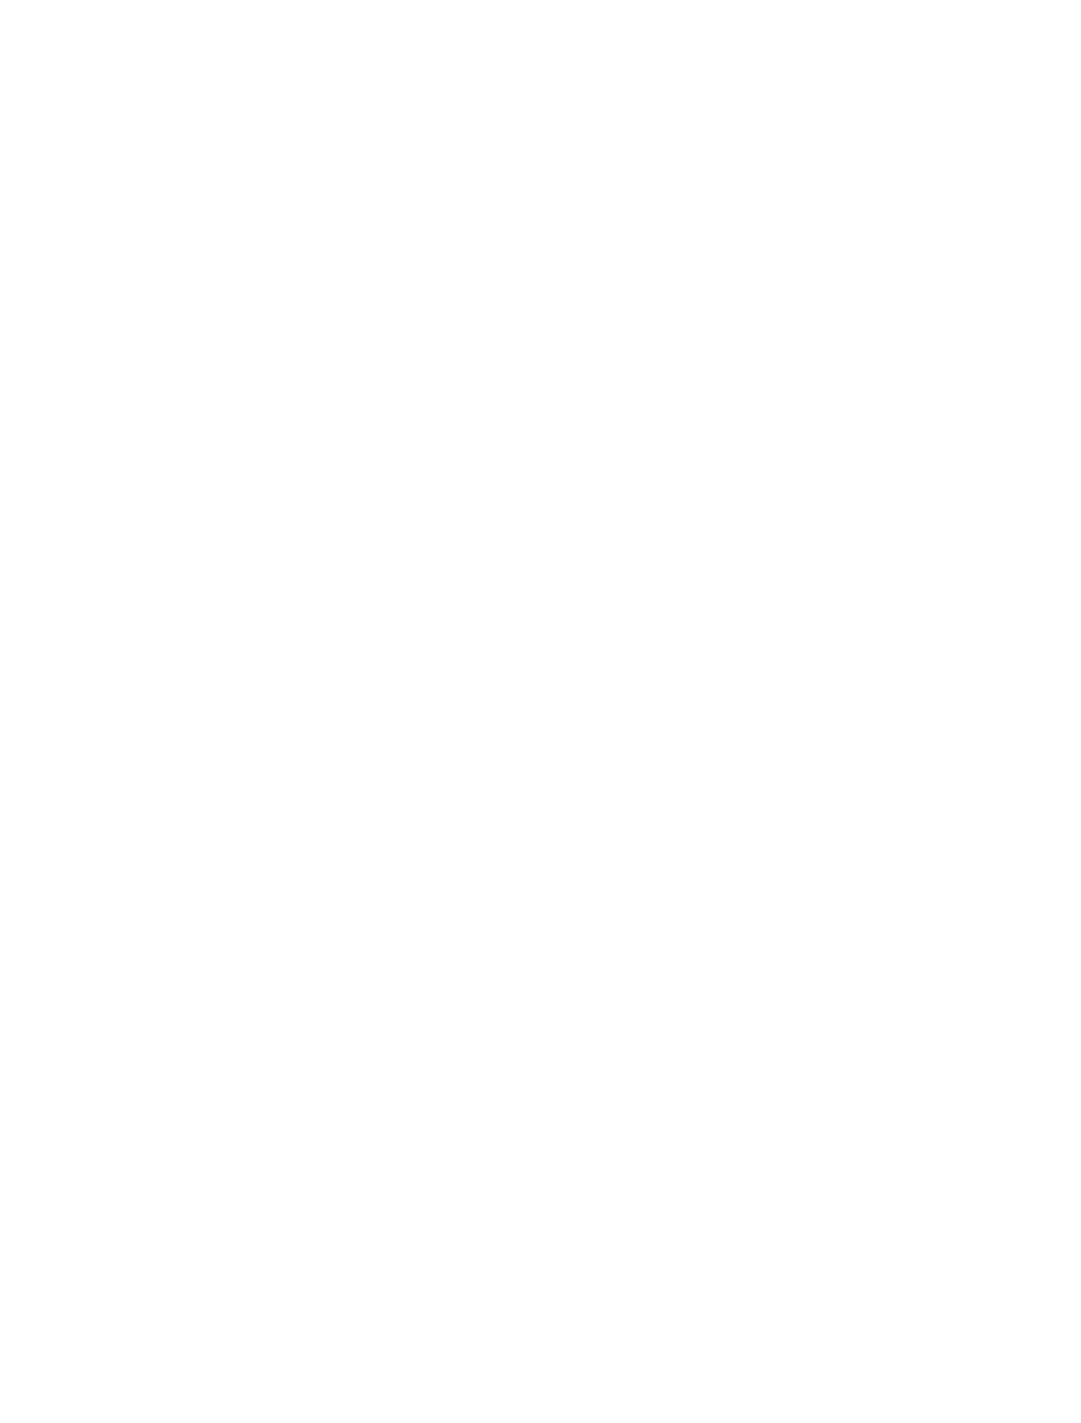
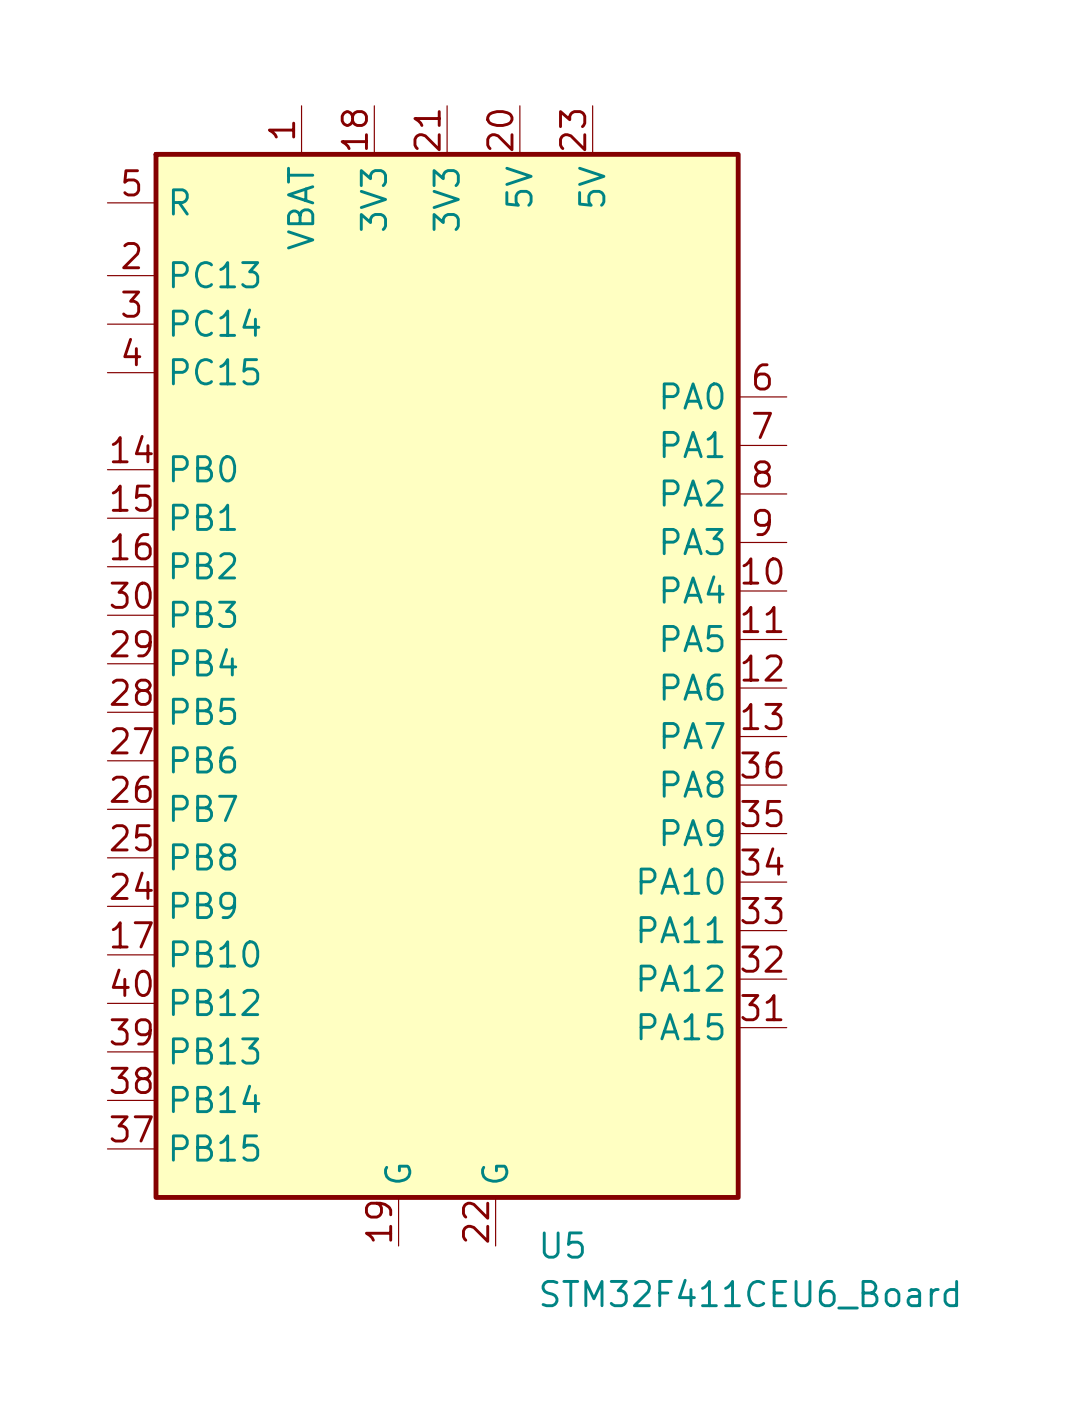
U5: none -> STM32F411CEU6_Board (447, 675)

